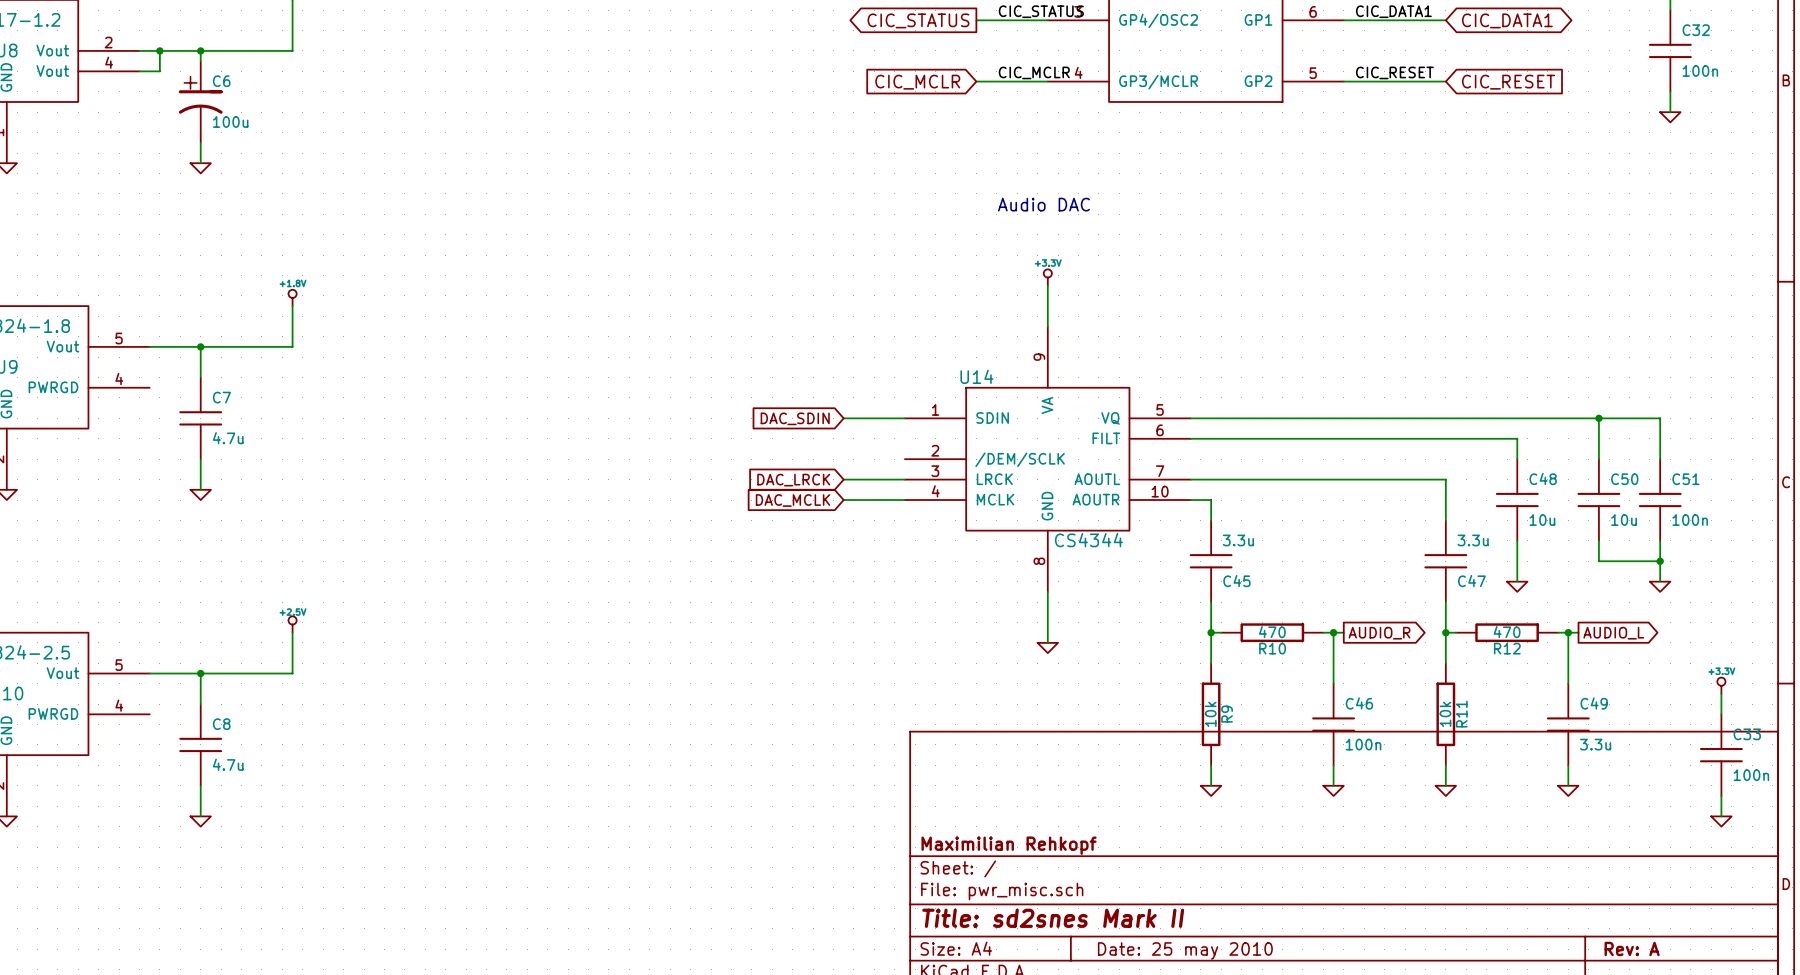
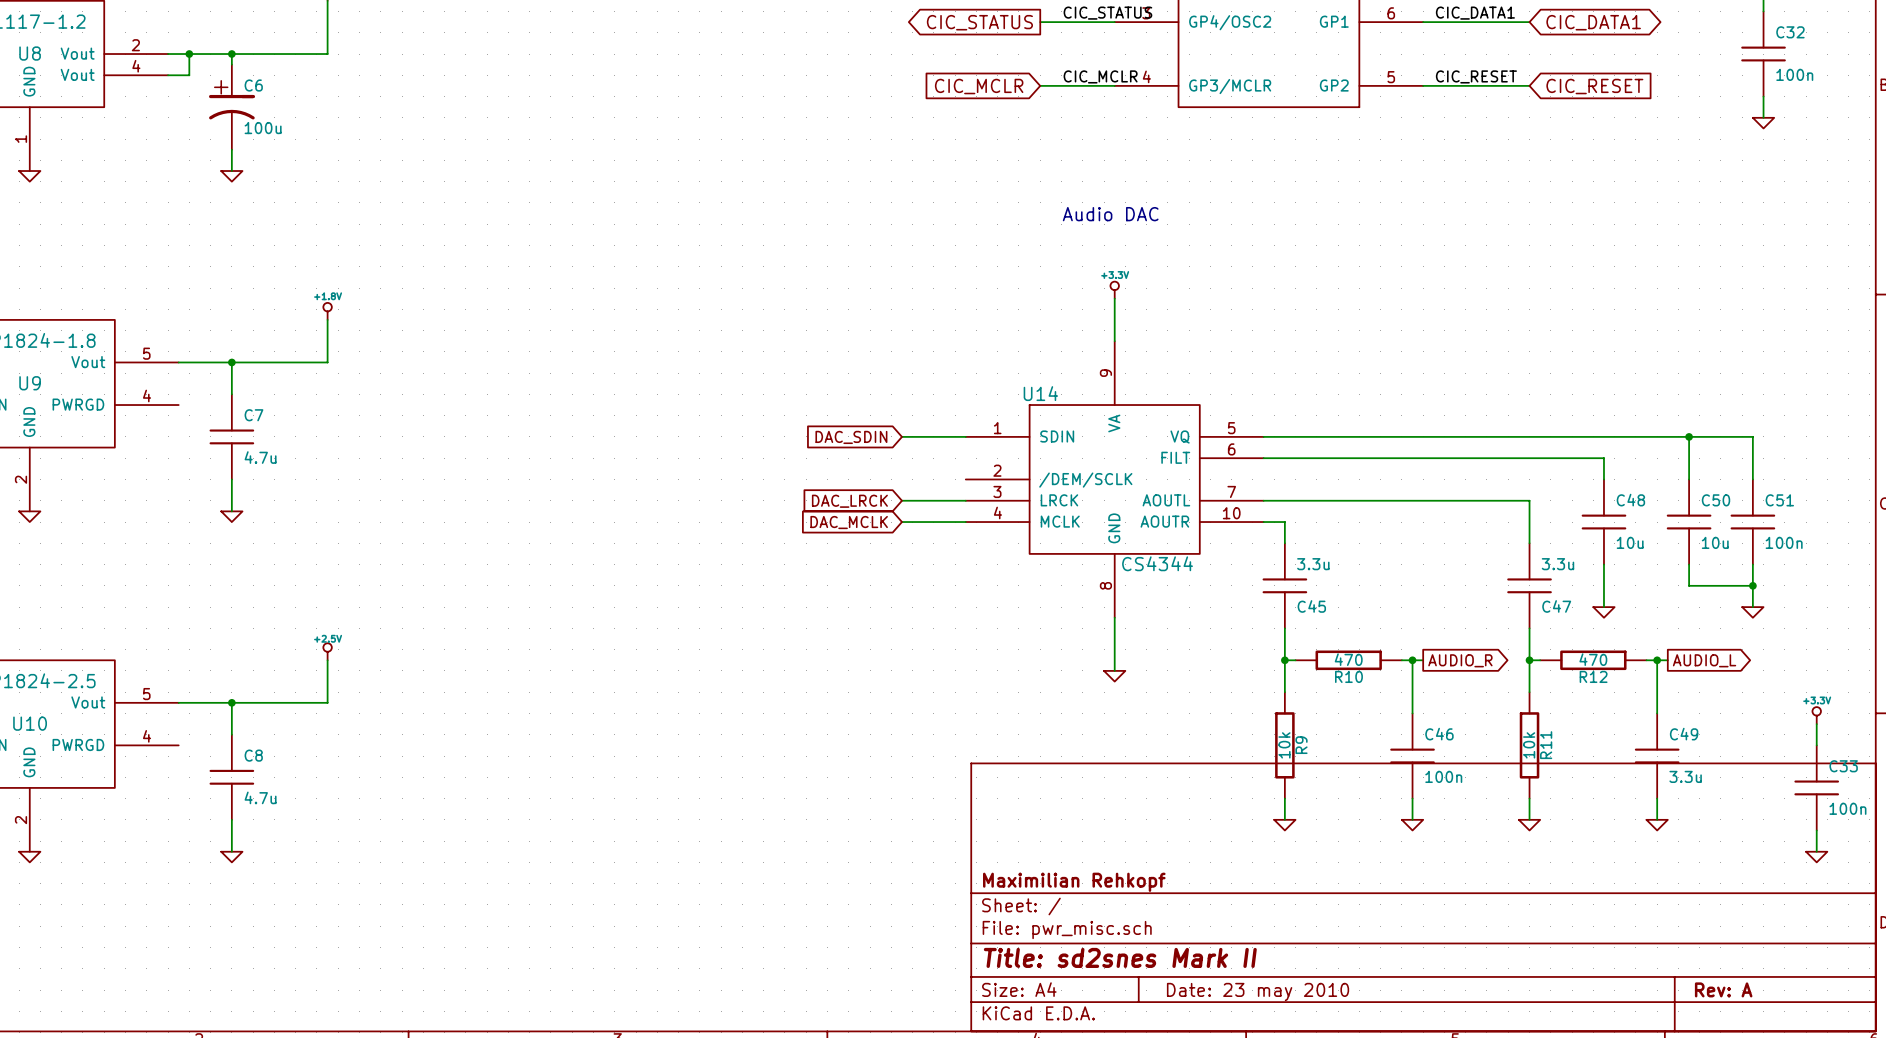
title block: Date: 25 may 2010 (1185, 950) -> Date: 23 may 2010 (1258, 992)

